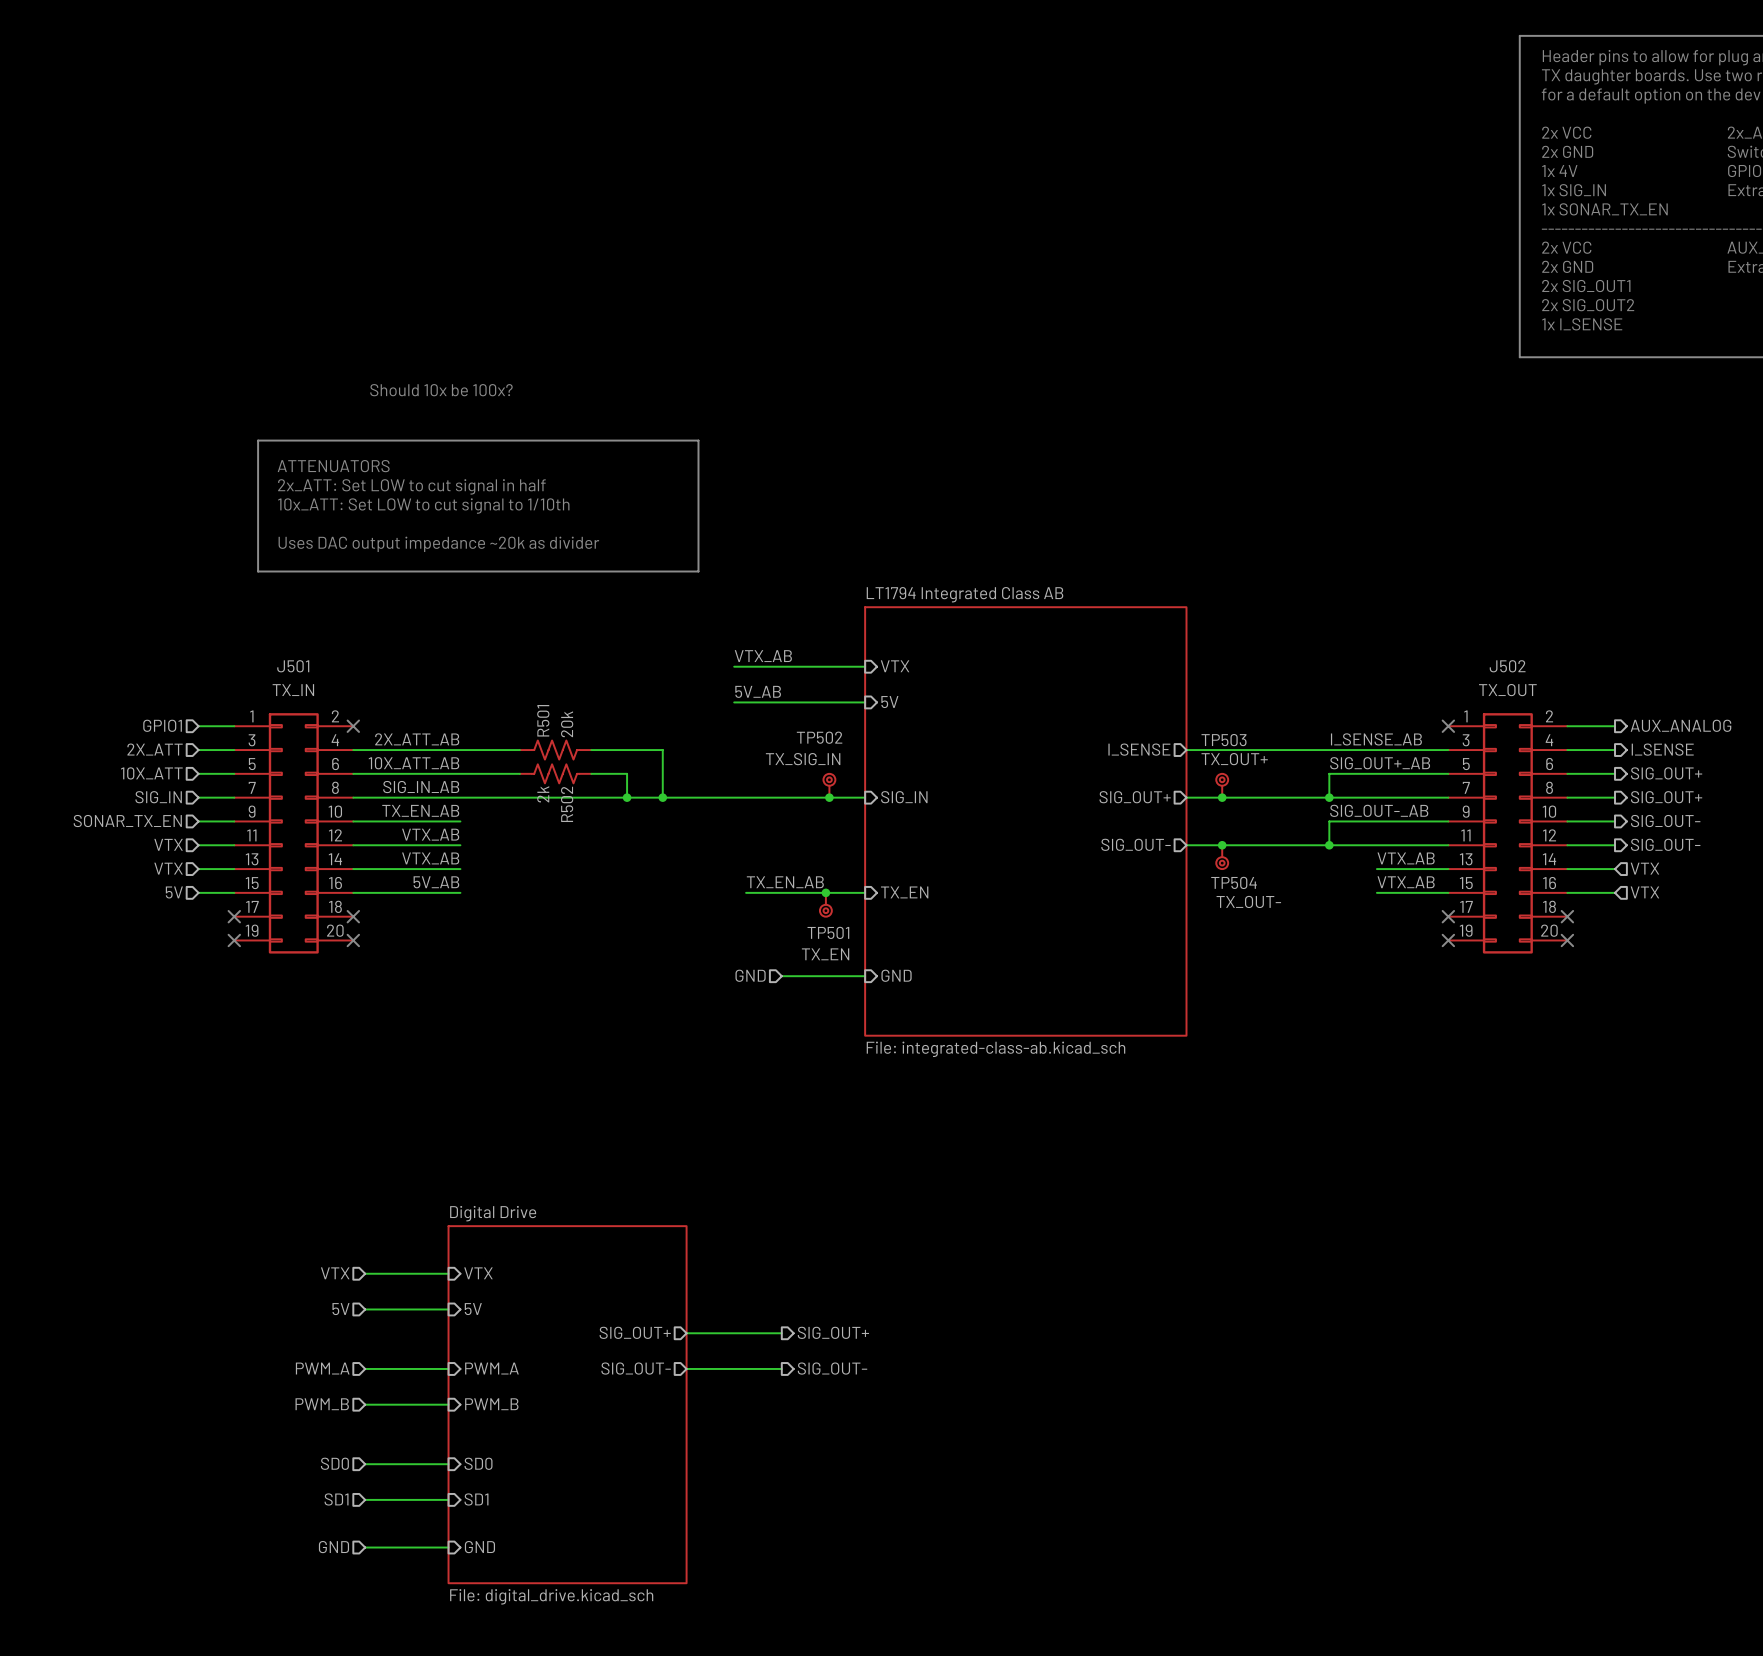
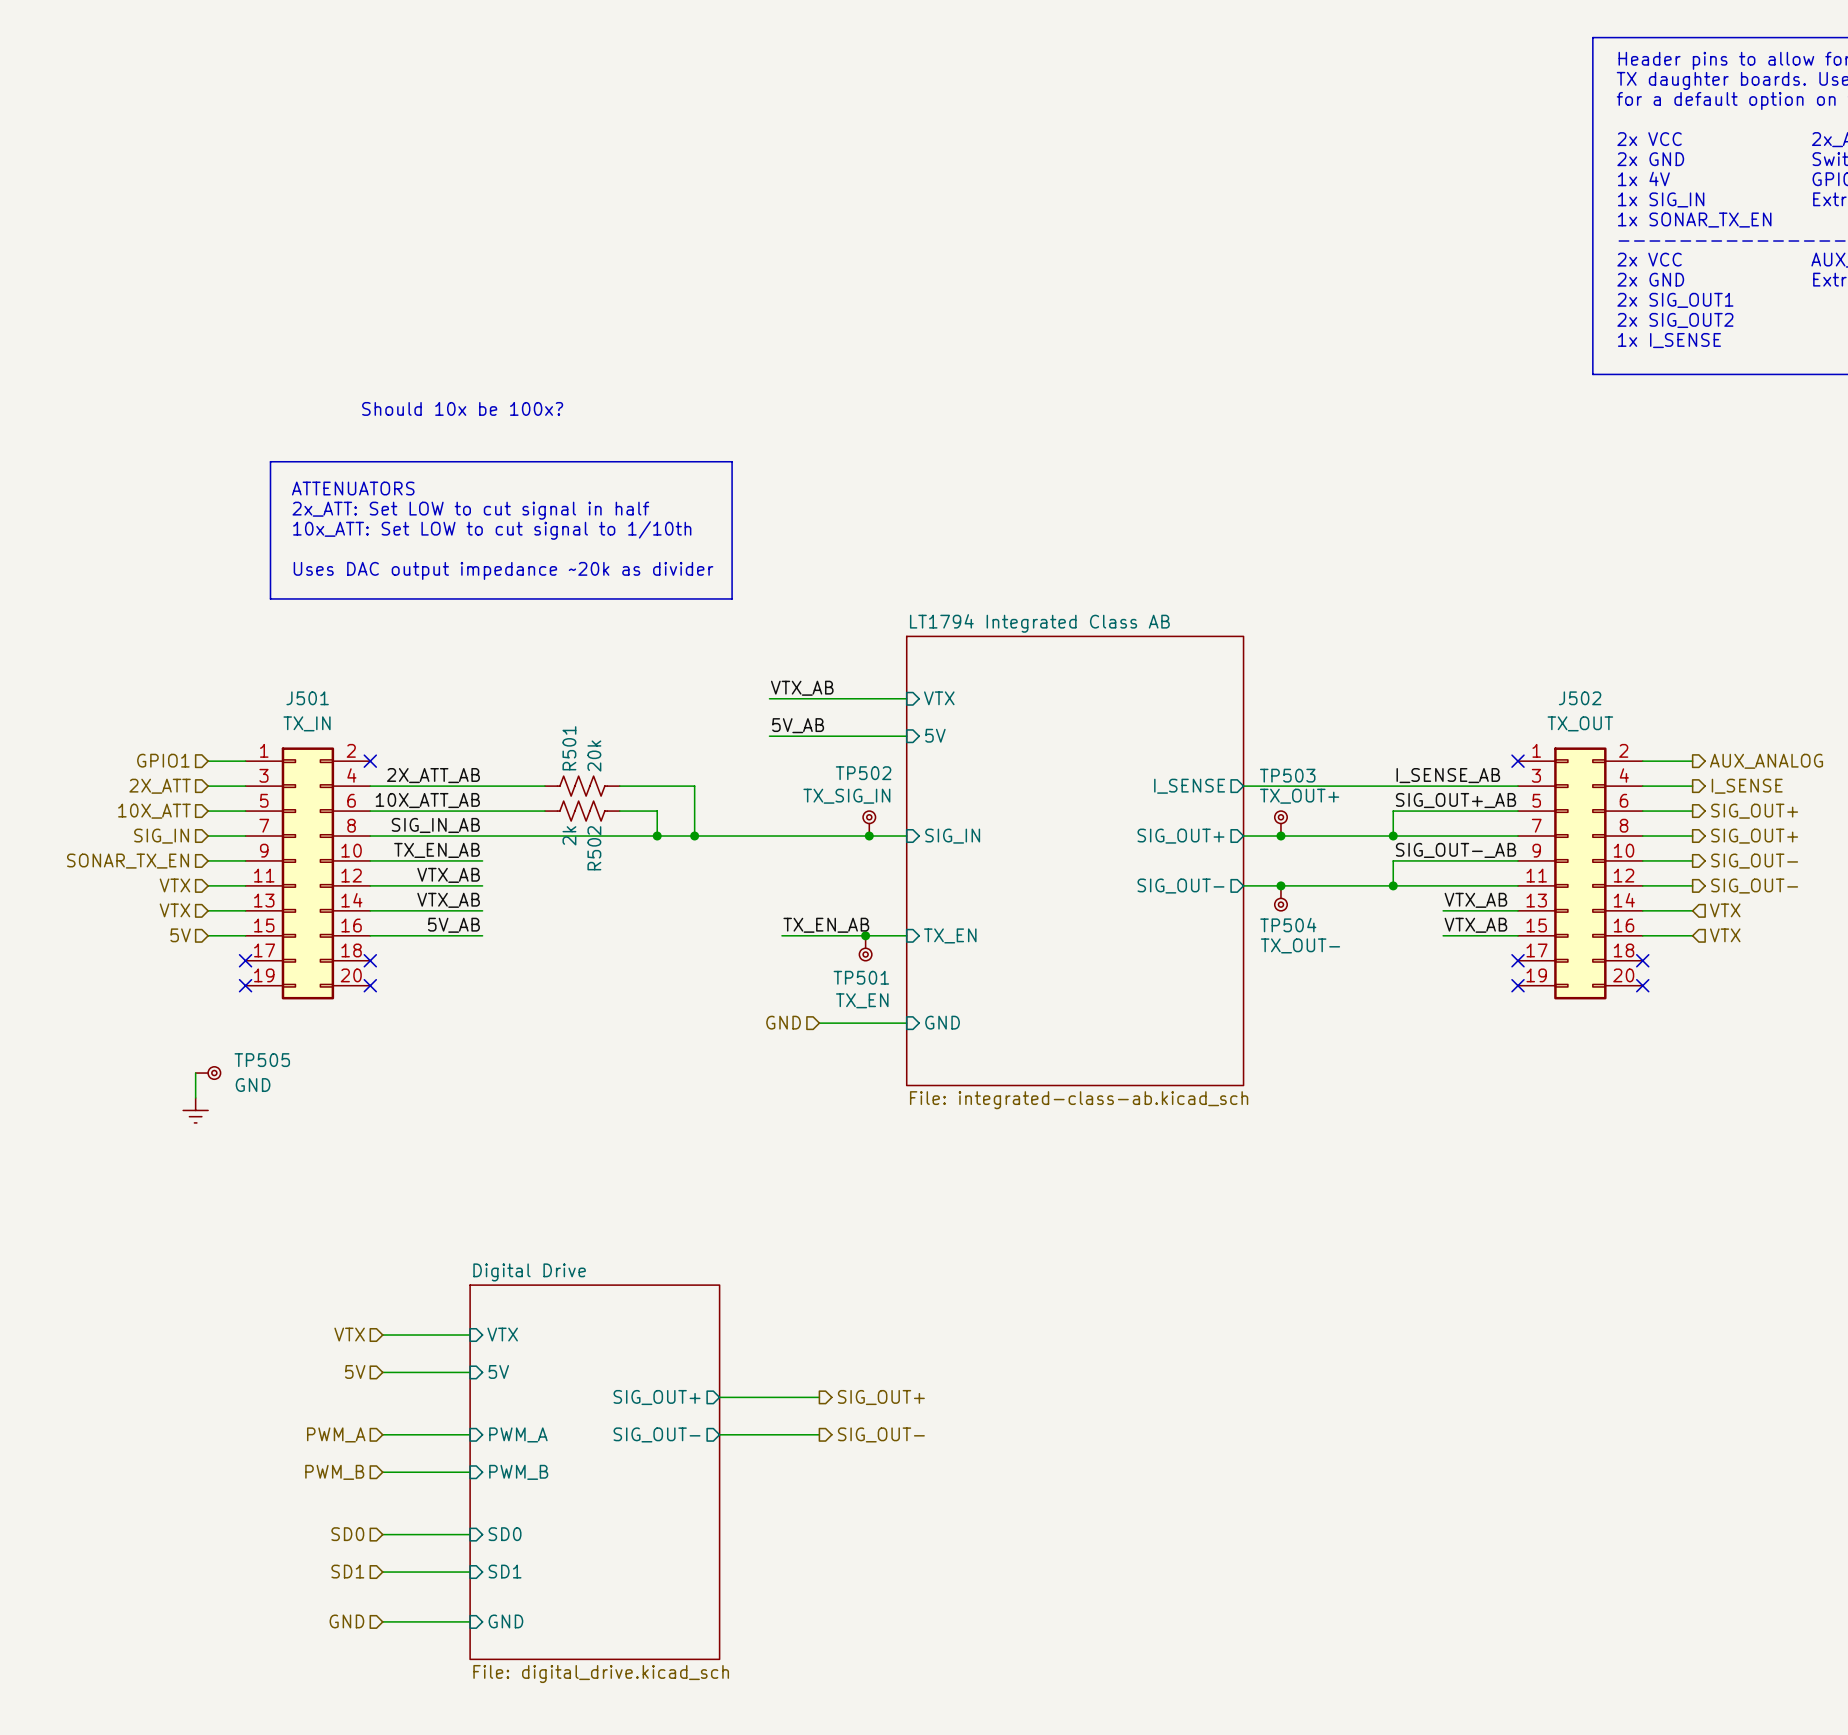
wire: none -> (195, 1073) (195, 1097)
TP505: none -> GND (208, 1073)
power symbol: none -> (195, 1110)

